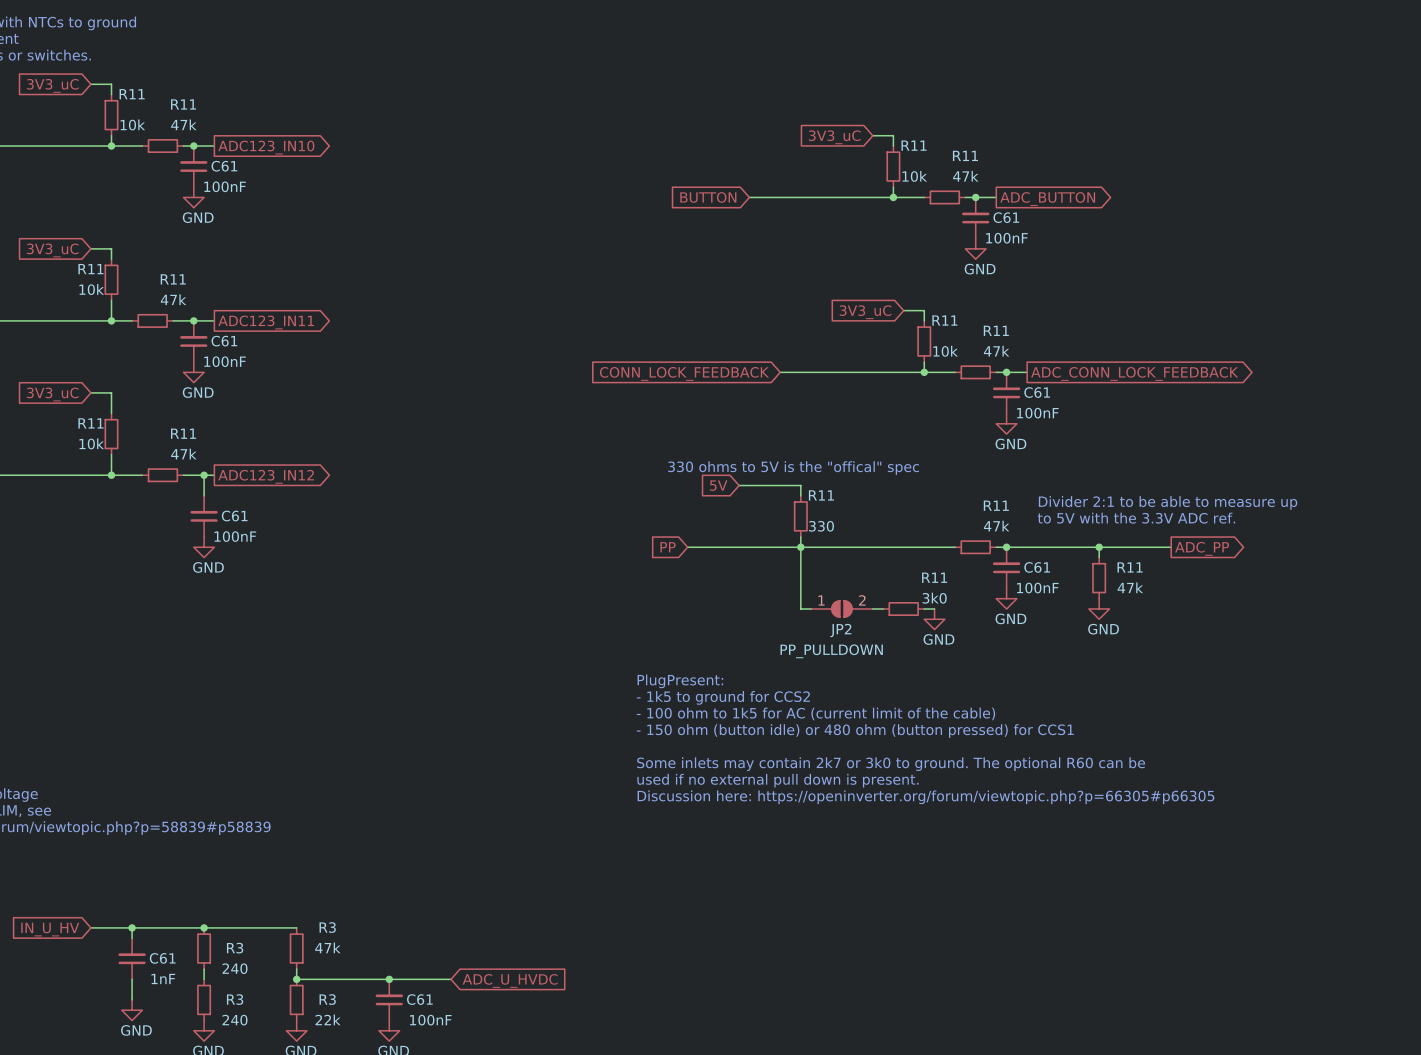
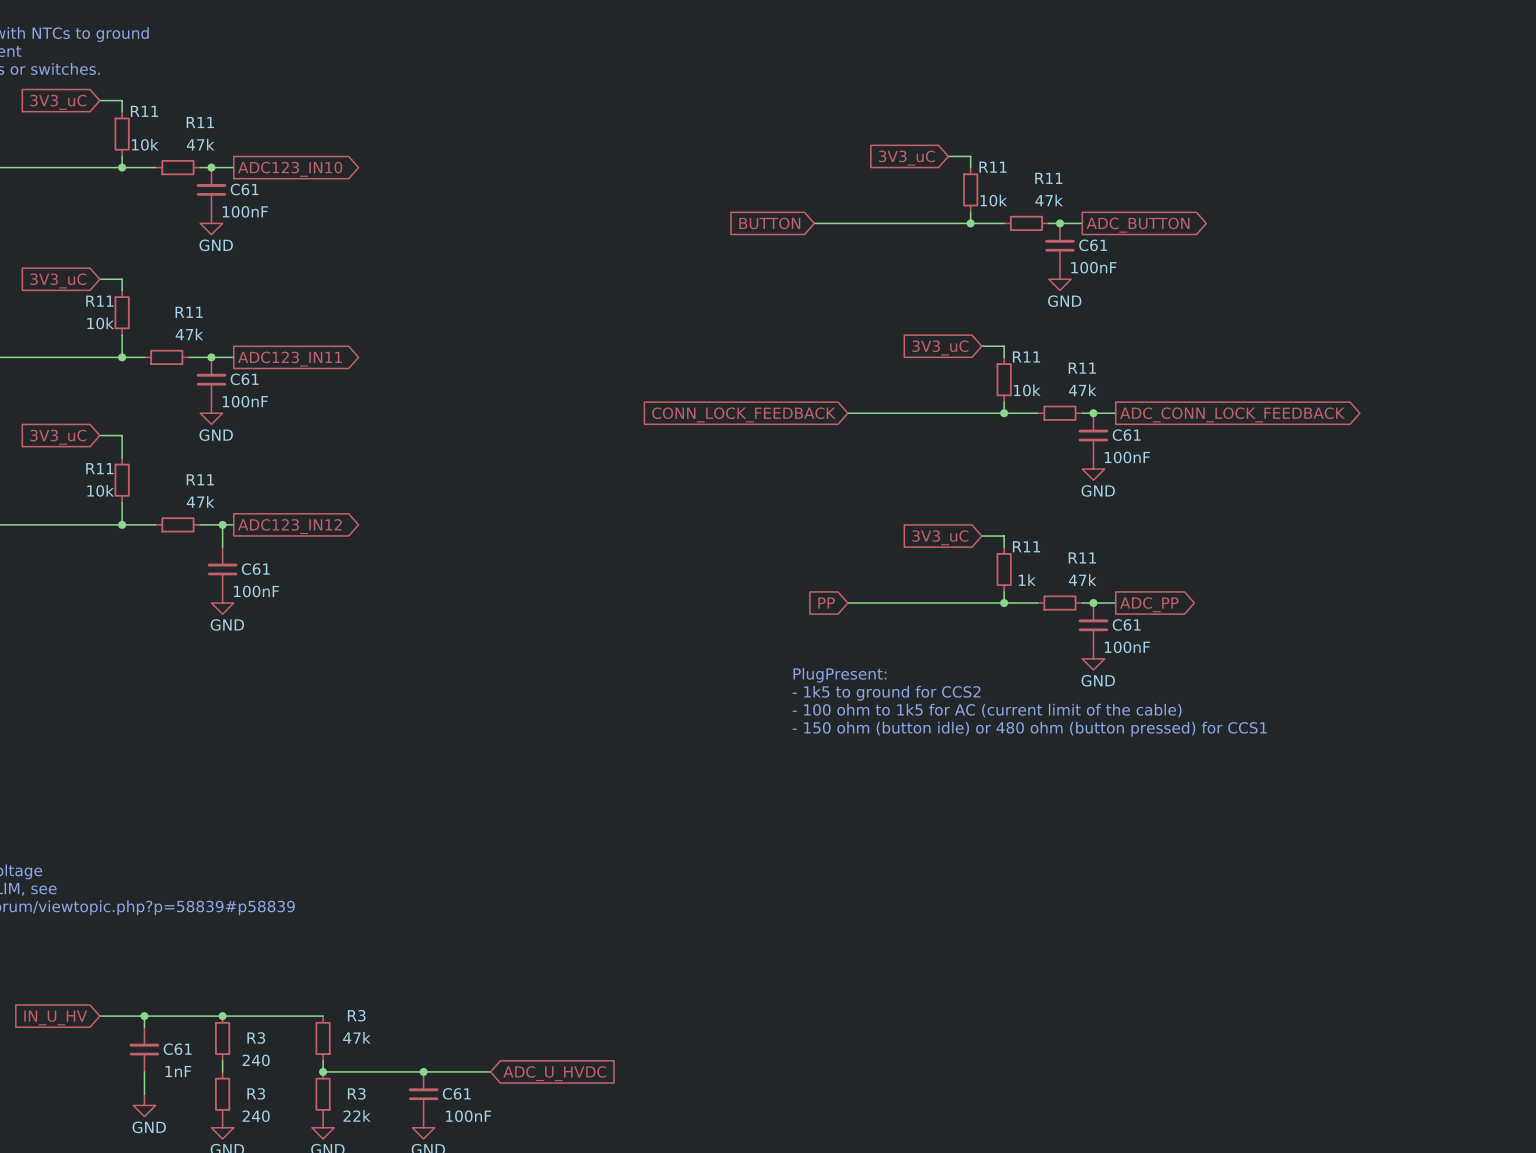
text: 330 ohms to 5V is the "offical" spec (793, 468) -> none
global label: 5V (718, 485) -> none
wire: (739, 485) (800, 485) (800, 495) -> none
wire: none -> (981, 536) (1004, 536) (1004, 547)
global label: none -> 3V3_uC (940, 537)
text: Divider 2:1 to be able to measure up (1168, 502) -> none
R11: 330 (800, 516) -> none
R11: none -> 1k (1004, 569)
text: to 5V with the 3.3V ADC ref. (1136, 518) -> none
wire: (800, 536) (800, 608) (811, 608) -> none
global label position: PP (668, 547) -> PP (826, 603)
wire: (687, 547) (780, 547) -> none
junction: (800, 547) -> none
junction: none -> (1004, 603)
wire: (1027, 547) (1171, 547) -> none
wire: (1099, 547) (1099, 557) -> (1004, 591) (1004, 603)
junction: (1099, 547) -> none
global label position: ADC_PP (1202, 548) -> ADC_PP (1149, 604)
R11: 47k (1099, 578) -> none
JP2: PP_PULLDOWN (841, 608) -> none
wire: (872, 608) (883, 608) -> none
R11: 3k0 (903, 608) -> none
wire: (924, 608) (934, 608) -> none
power symbol: GND (1099, 608) -> none
power symbol: GND (934, 619) -> none
text position: PlugPresent: (680, 681) -> PlugPresent: (839, 675)
text position: - 1k5 to ground for CCS2 (723, 697) -> - 1k5 to ground for CCS2 (886, 693)
text position: - 100 ohm to 1k5 for AC (current limit of the cable) (816, 713) -> - 100 ohm to 1k5 for AC (current limit of the cable) (987, 710)
text position: - 150 ohm (button idle) or 480 ohm (button pressed) for CCS1 (855, 731) -> - 150 ohm (button idle) or 480 ohm (button pressed) for CCS1 (1029, 729)
text: Some inlets may contain 2k7 or 3k0 to ground. The optional R60 can be (891, 764) -> none
text: used if no external pull down is present. (777, 780) -> none
text: Discussion here: https://openinverter.org/forum/viewtopic.php?p=66305#p66305 (925, 797) -> none

